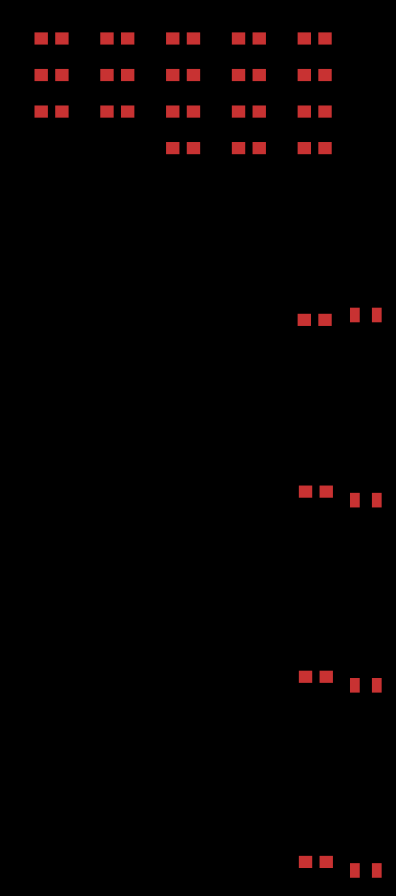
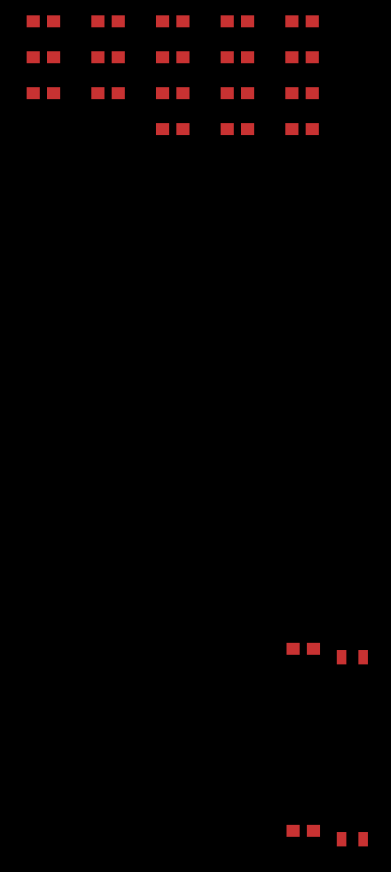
part: (365, 314) -> none
part: (314, 319) -> none
part: (315, 491) -> none
part: (365, 500) -> none

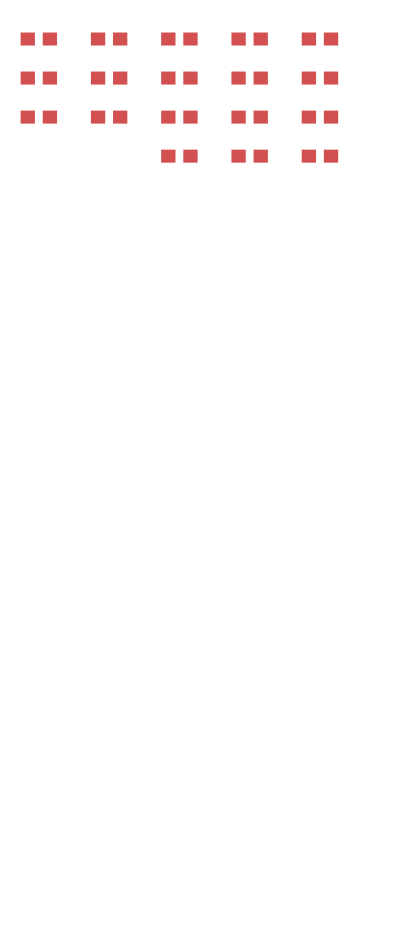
part: (303, 648) -> none
part: (352, 657) -> none
part: (303, 830) -> none
part: (352, 839) -> none

